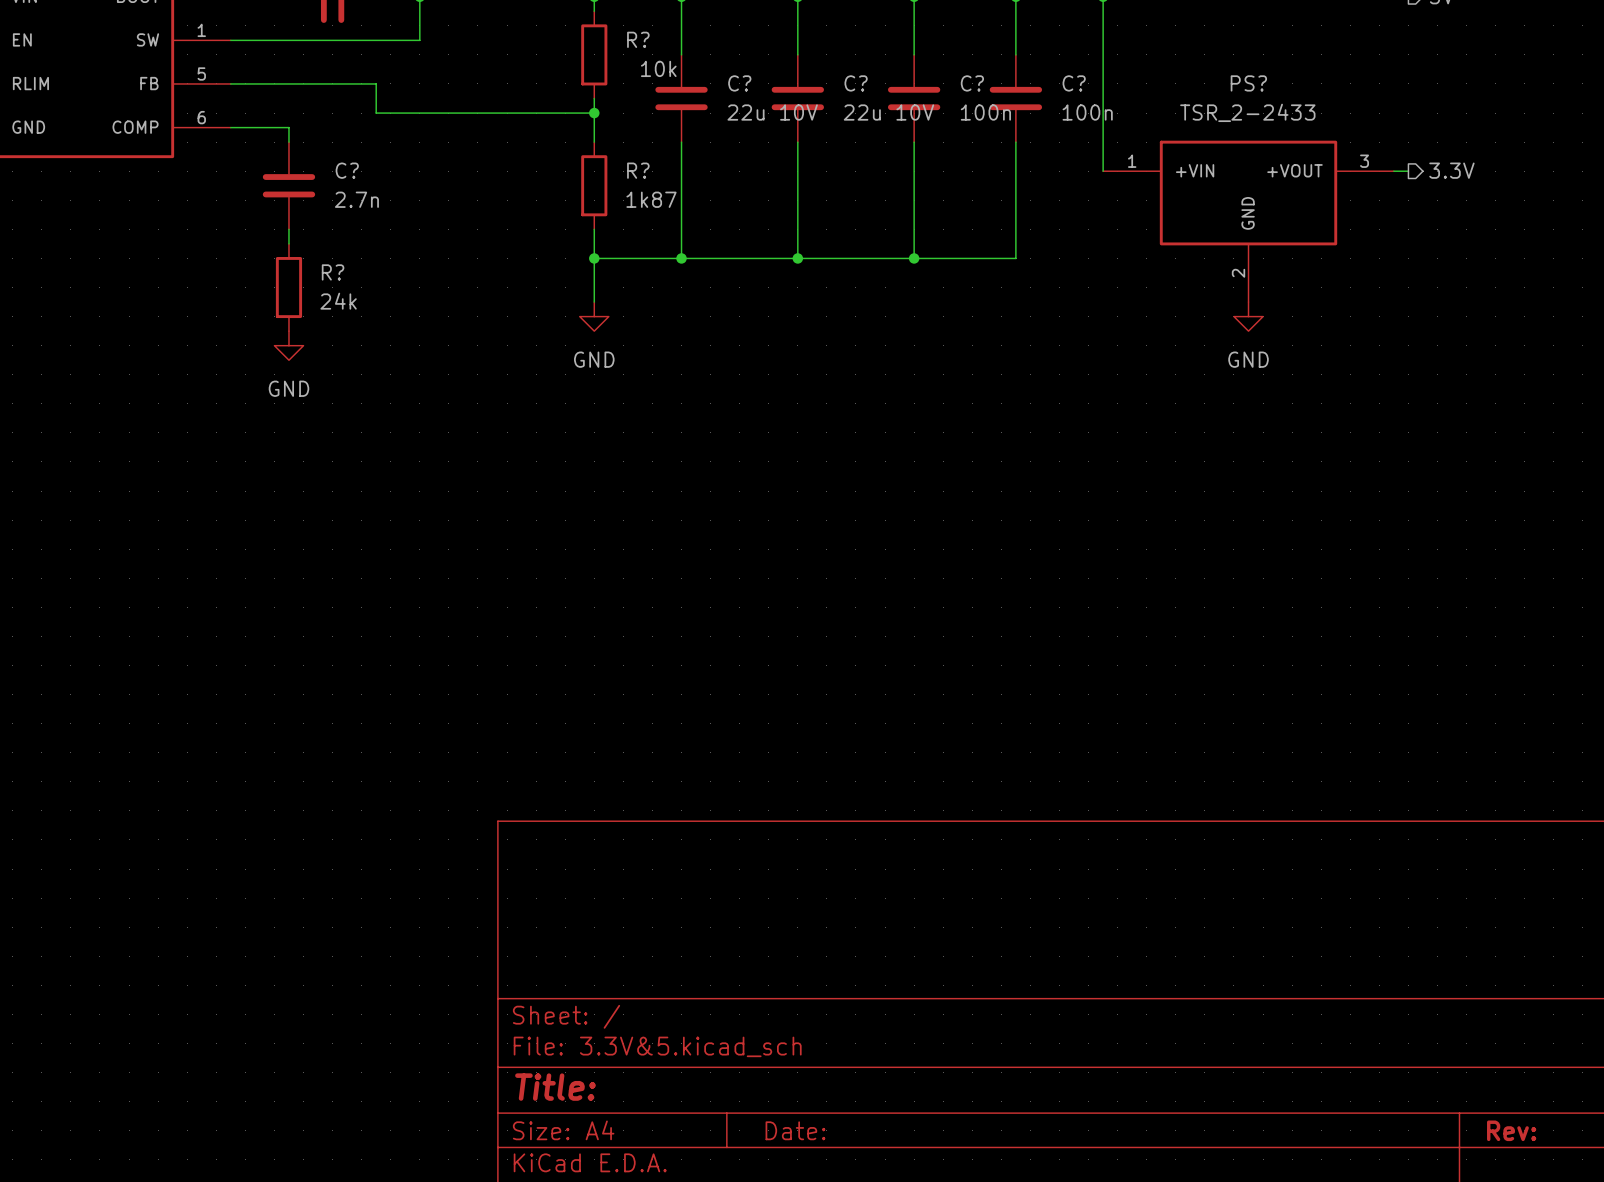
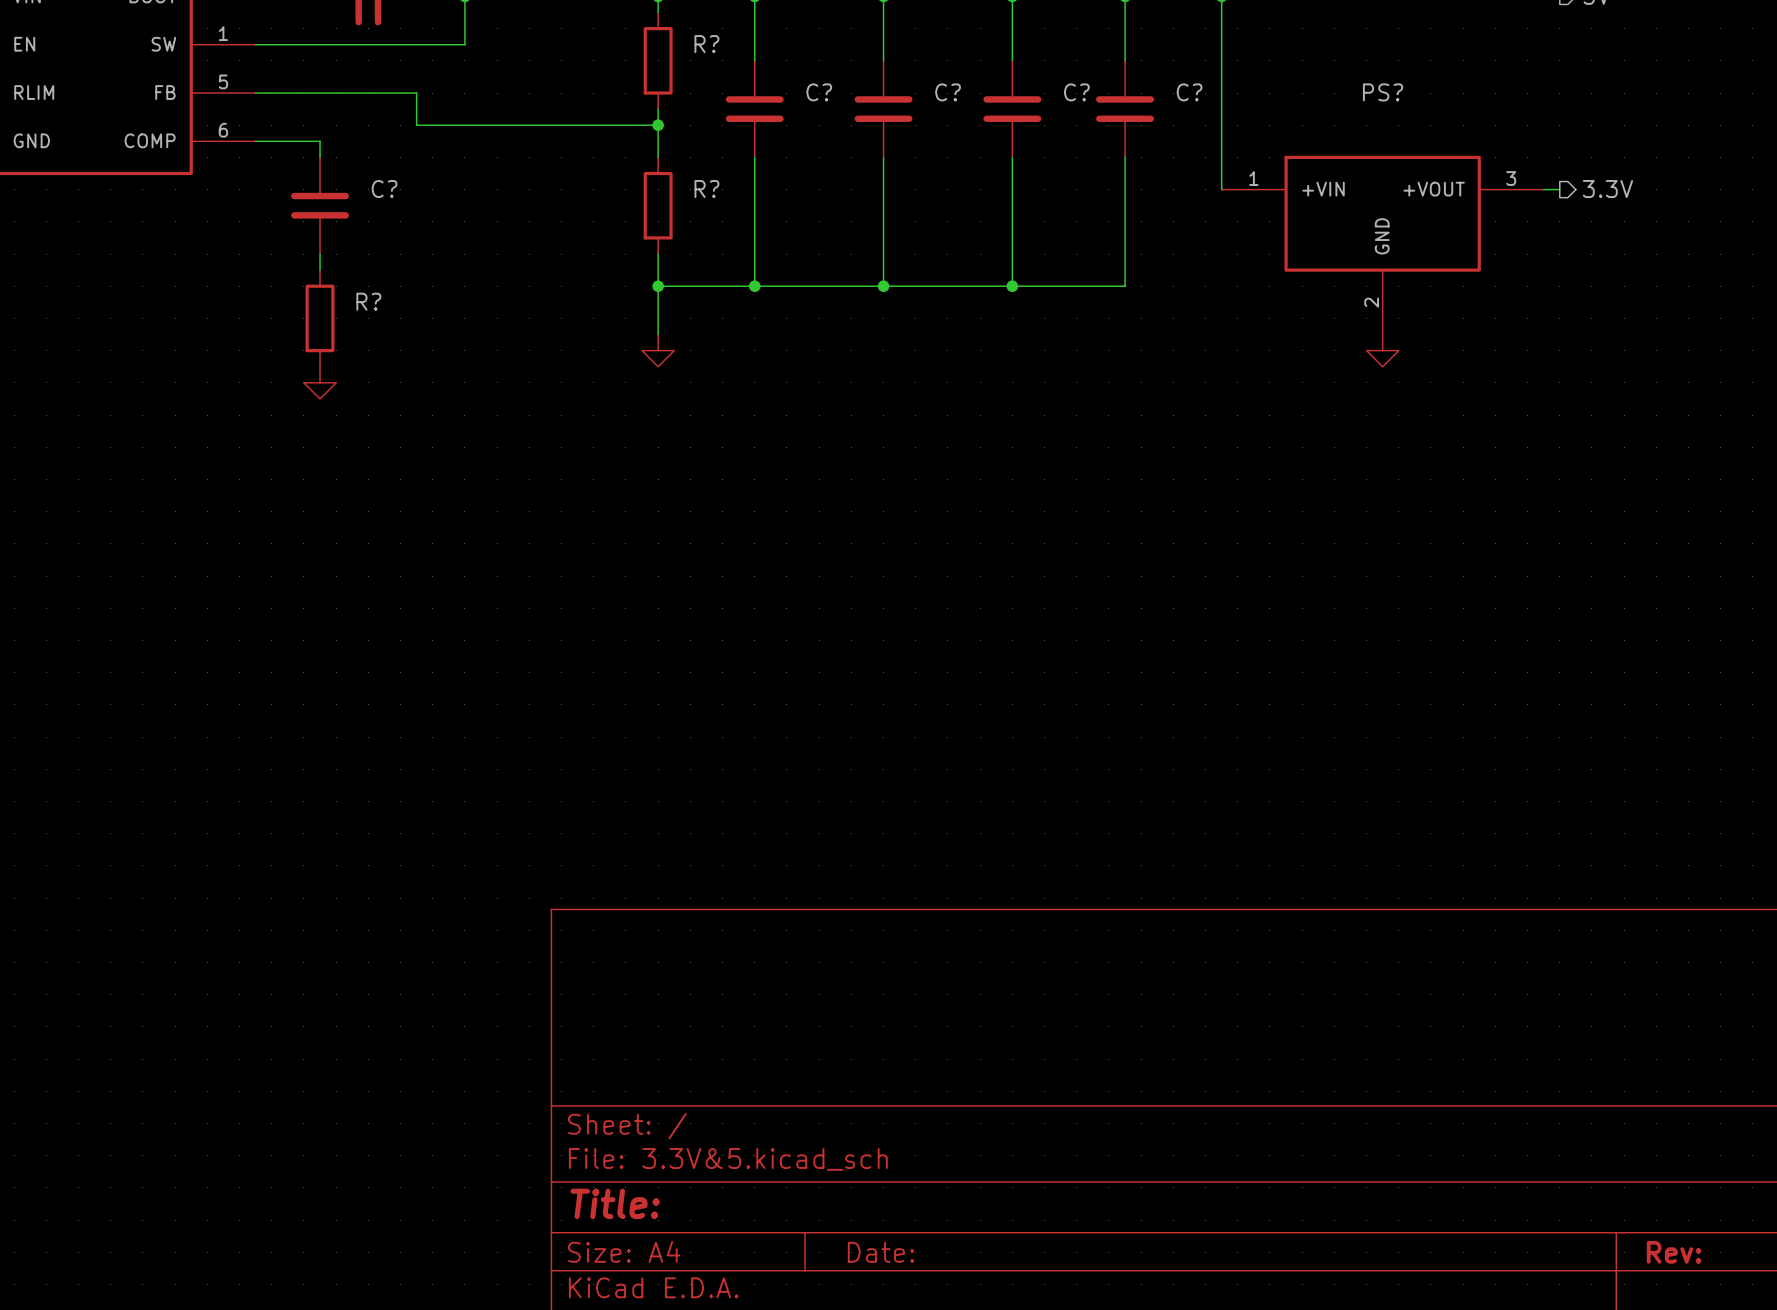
R? value: 10k (658, 68) -> none
C? value: 22u 10V (772, 112) -> none
C? value: 22u 10V (888, 112) -> none
C? value: 100n (985, 112) -> none
C? value: 100n (1087, 112) -> none
PS? value: TSR_2-2433 (1247, 112) -> none
C? value: 2.7n (356, 199) -> none
R? value: 1k87 (651, 199) -> none
R? value: 24k (338, 301) -> none
power symbol text: GND (594, 359) -> none
power symbol text: GND (1248, 359) -> none
power symbol text: GND (288, 388) -> none

